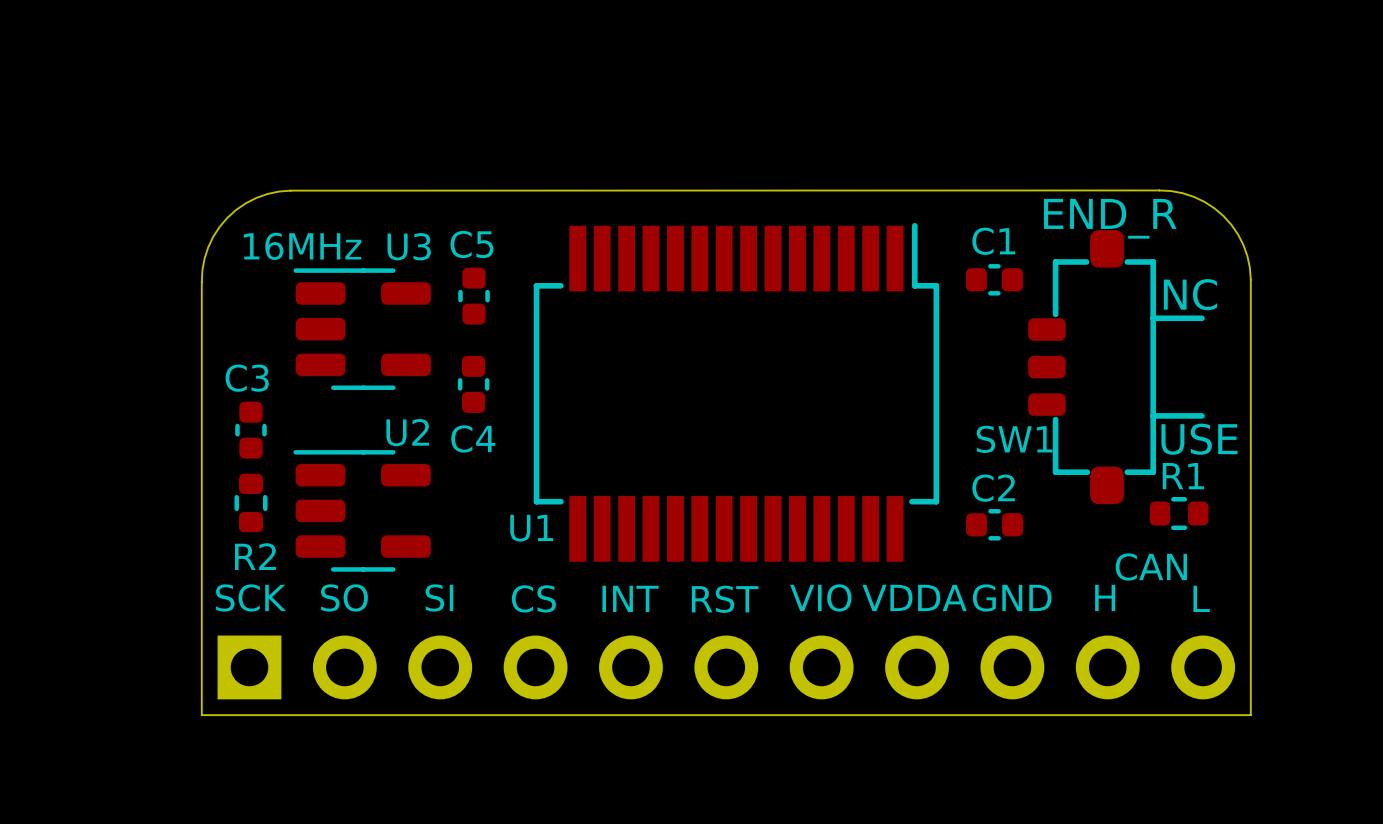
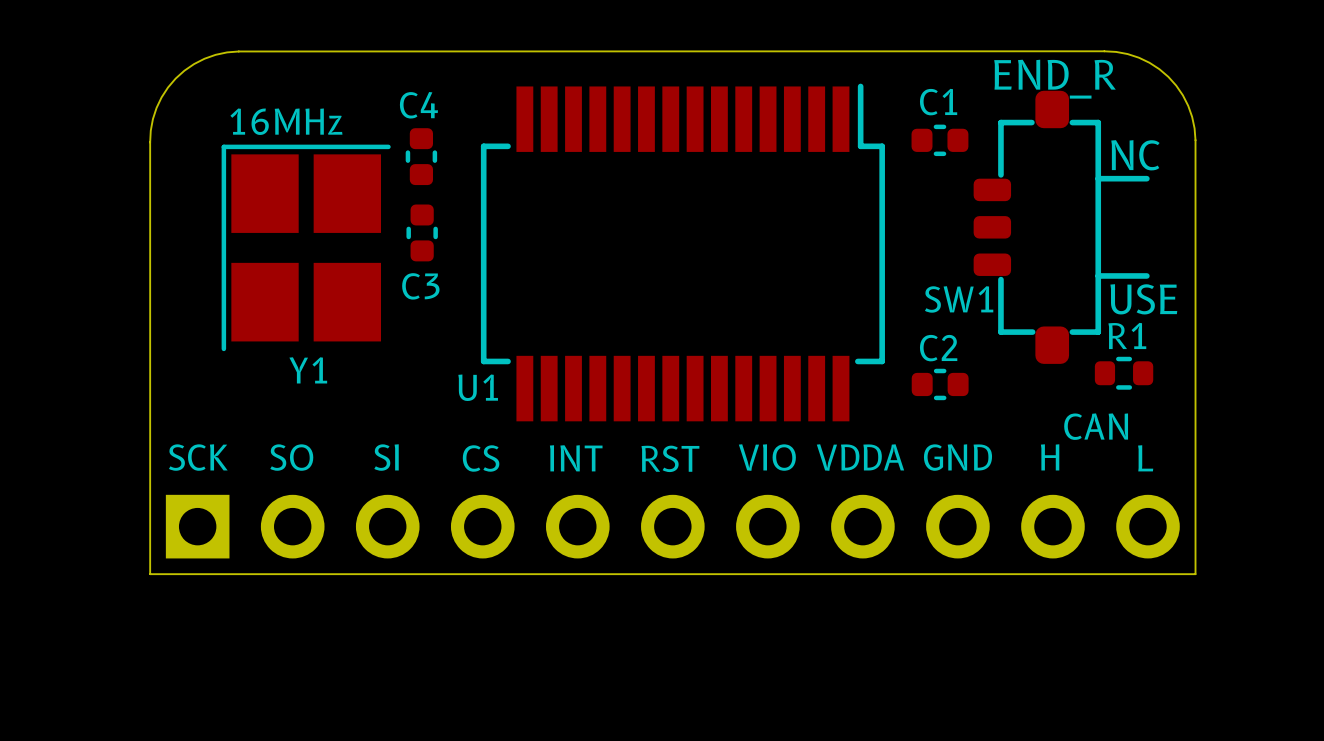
C5 name: C5 (471, 244) -> C4 (418, 105)
text position: 16MHz (302, 246) -> 16MHz (286, 121)
U3: (362, 329) -> none
C3 name position: C3 (247, 378) -> C3 (420, 286)
C4: (473, 384) -> none
Y1: none -> (306, 247)
C3 position: (250, 430) -> (422, 232)
R2: (250, 503) -> none
U2: (362, 510) -> none

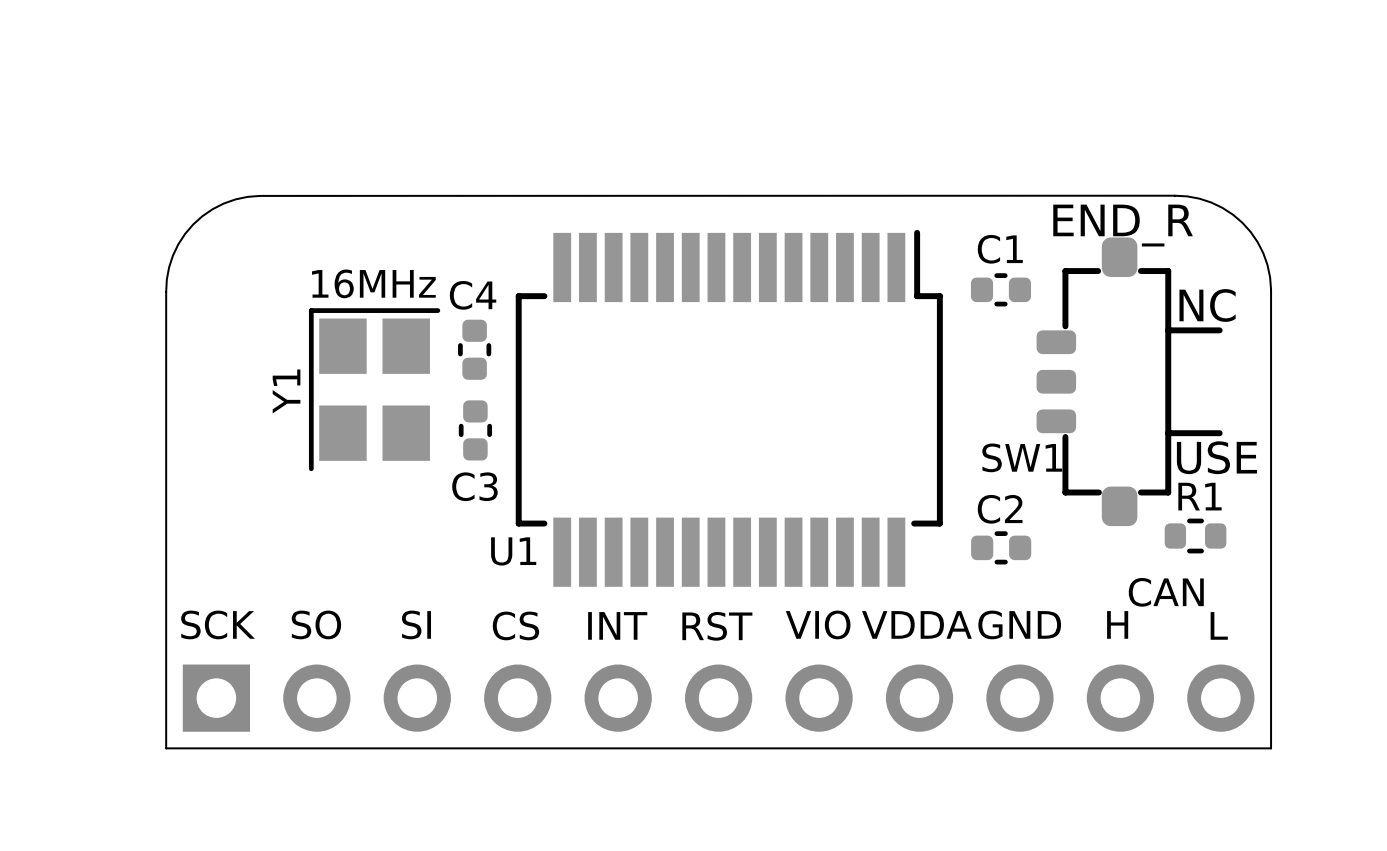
text position: 16MHz (286, 121) -> 16MHz (373, 283)
Y1 footprint: [221, 144, 391, 352] -> [308, 308, 441, 472]
C4 position: (421, 156) -> (474, 349)
C3 position: (422, 232) -> (475, 430)
Y1 name position: Y1 (308, 370) -> Y1 (286, 391)

